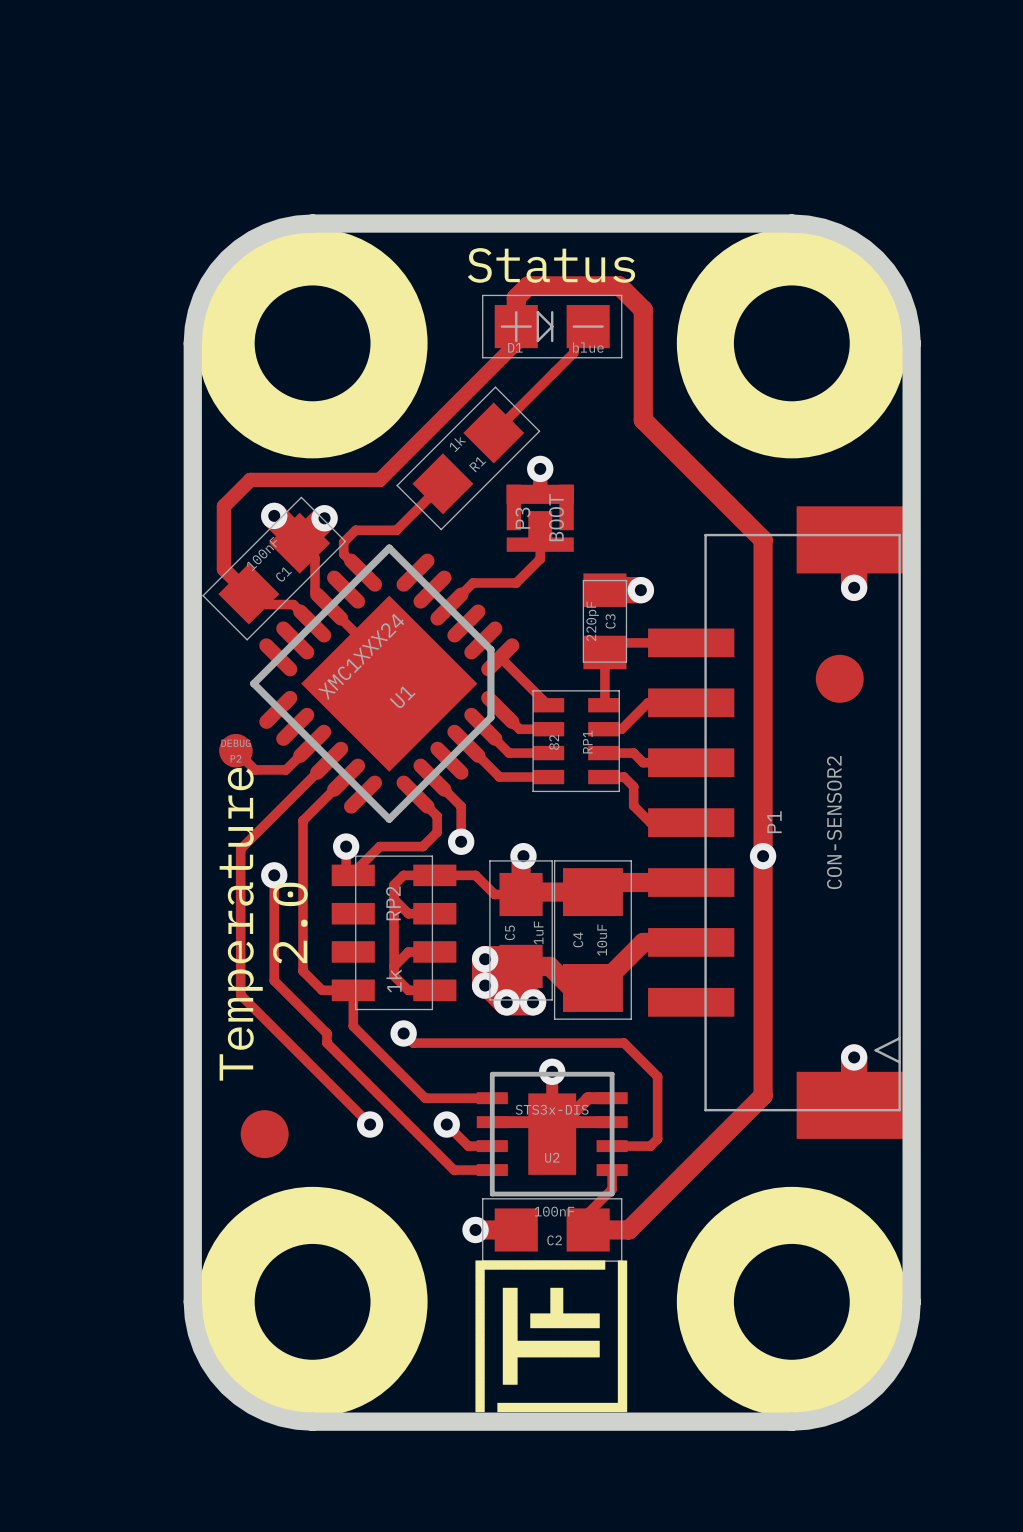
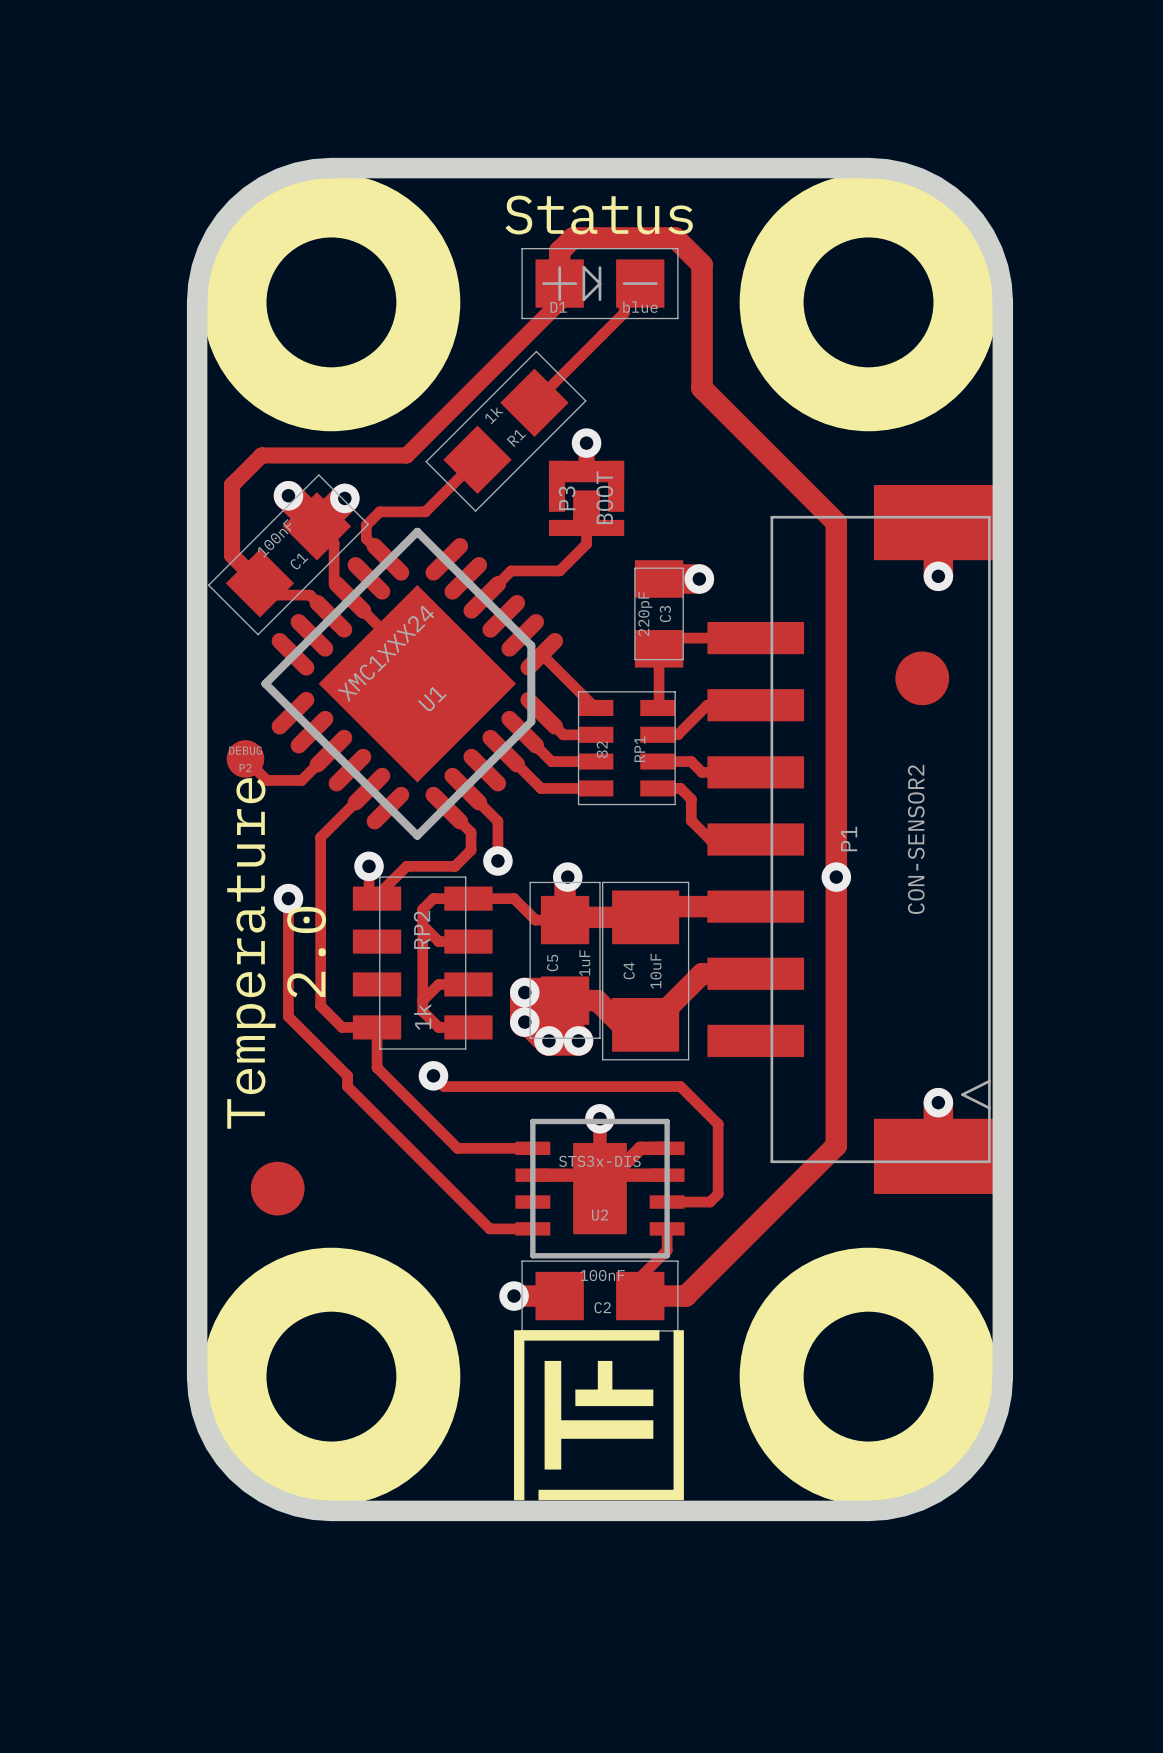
track: (329, 760) (240, 849) (240, 995) (370, 1124) -> none
via: (370, 1124) -> none
track: (446, 1124) (468, 1146) (492, 1146) -> none
via: (446, 1124) -> none

